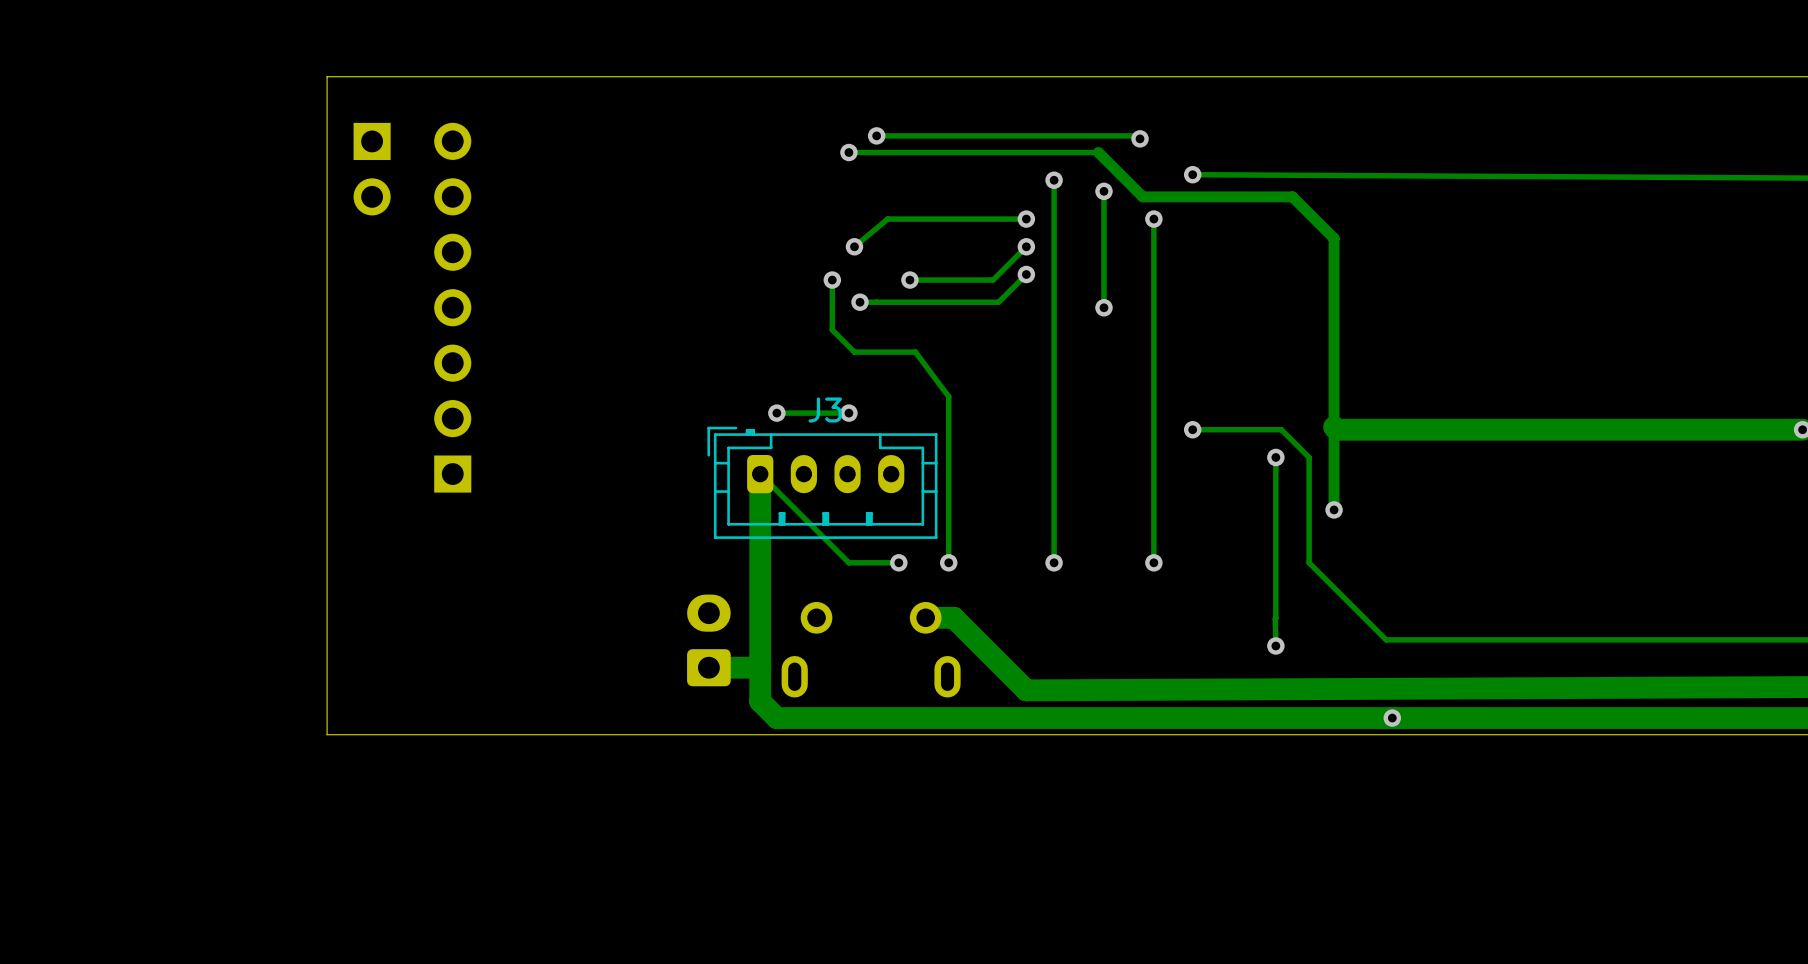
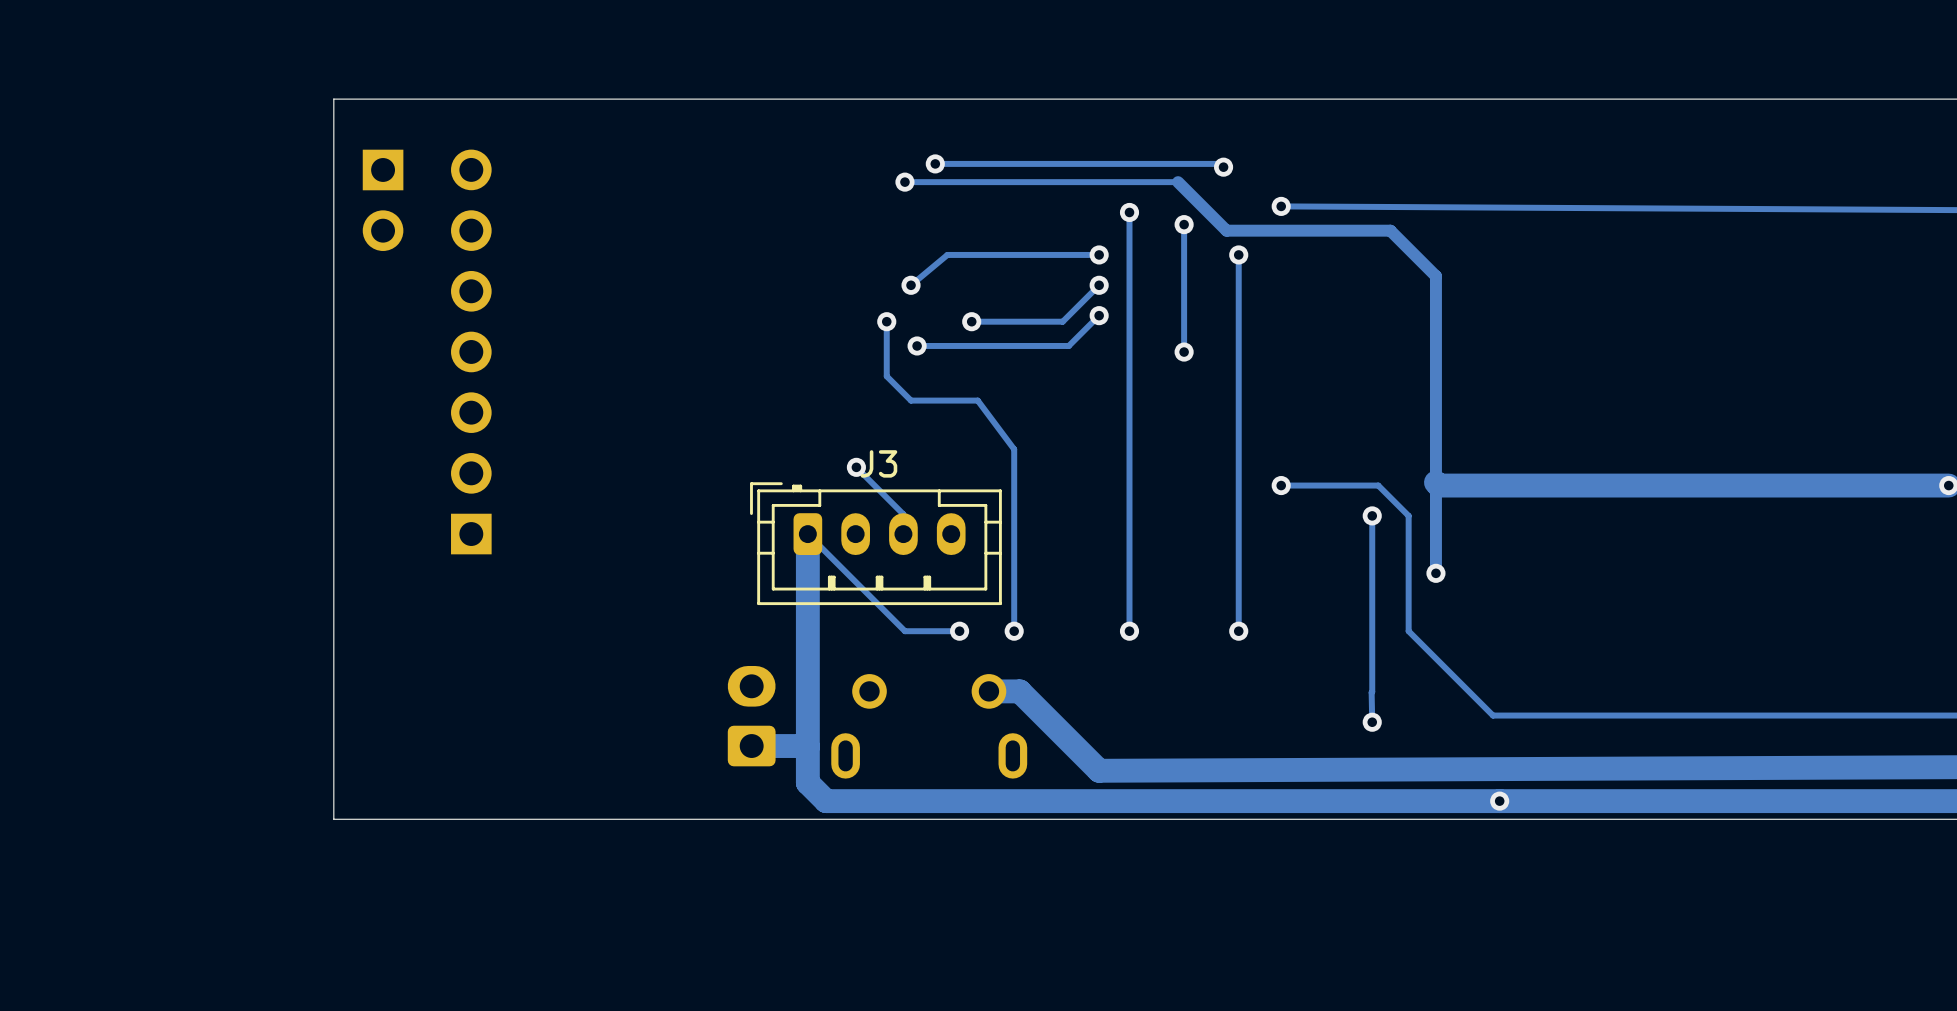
via: (776, 413) -> none
track: none -> (856, 467) (903, 514) (903, 534)
via: none -> (856, 467)
track: (848, 413) (776, 413) -> none
via: (848, 413) -> none

